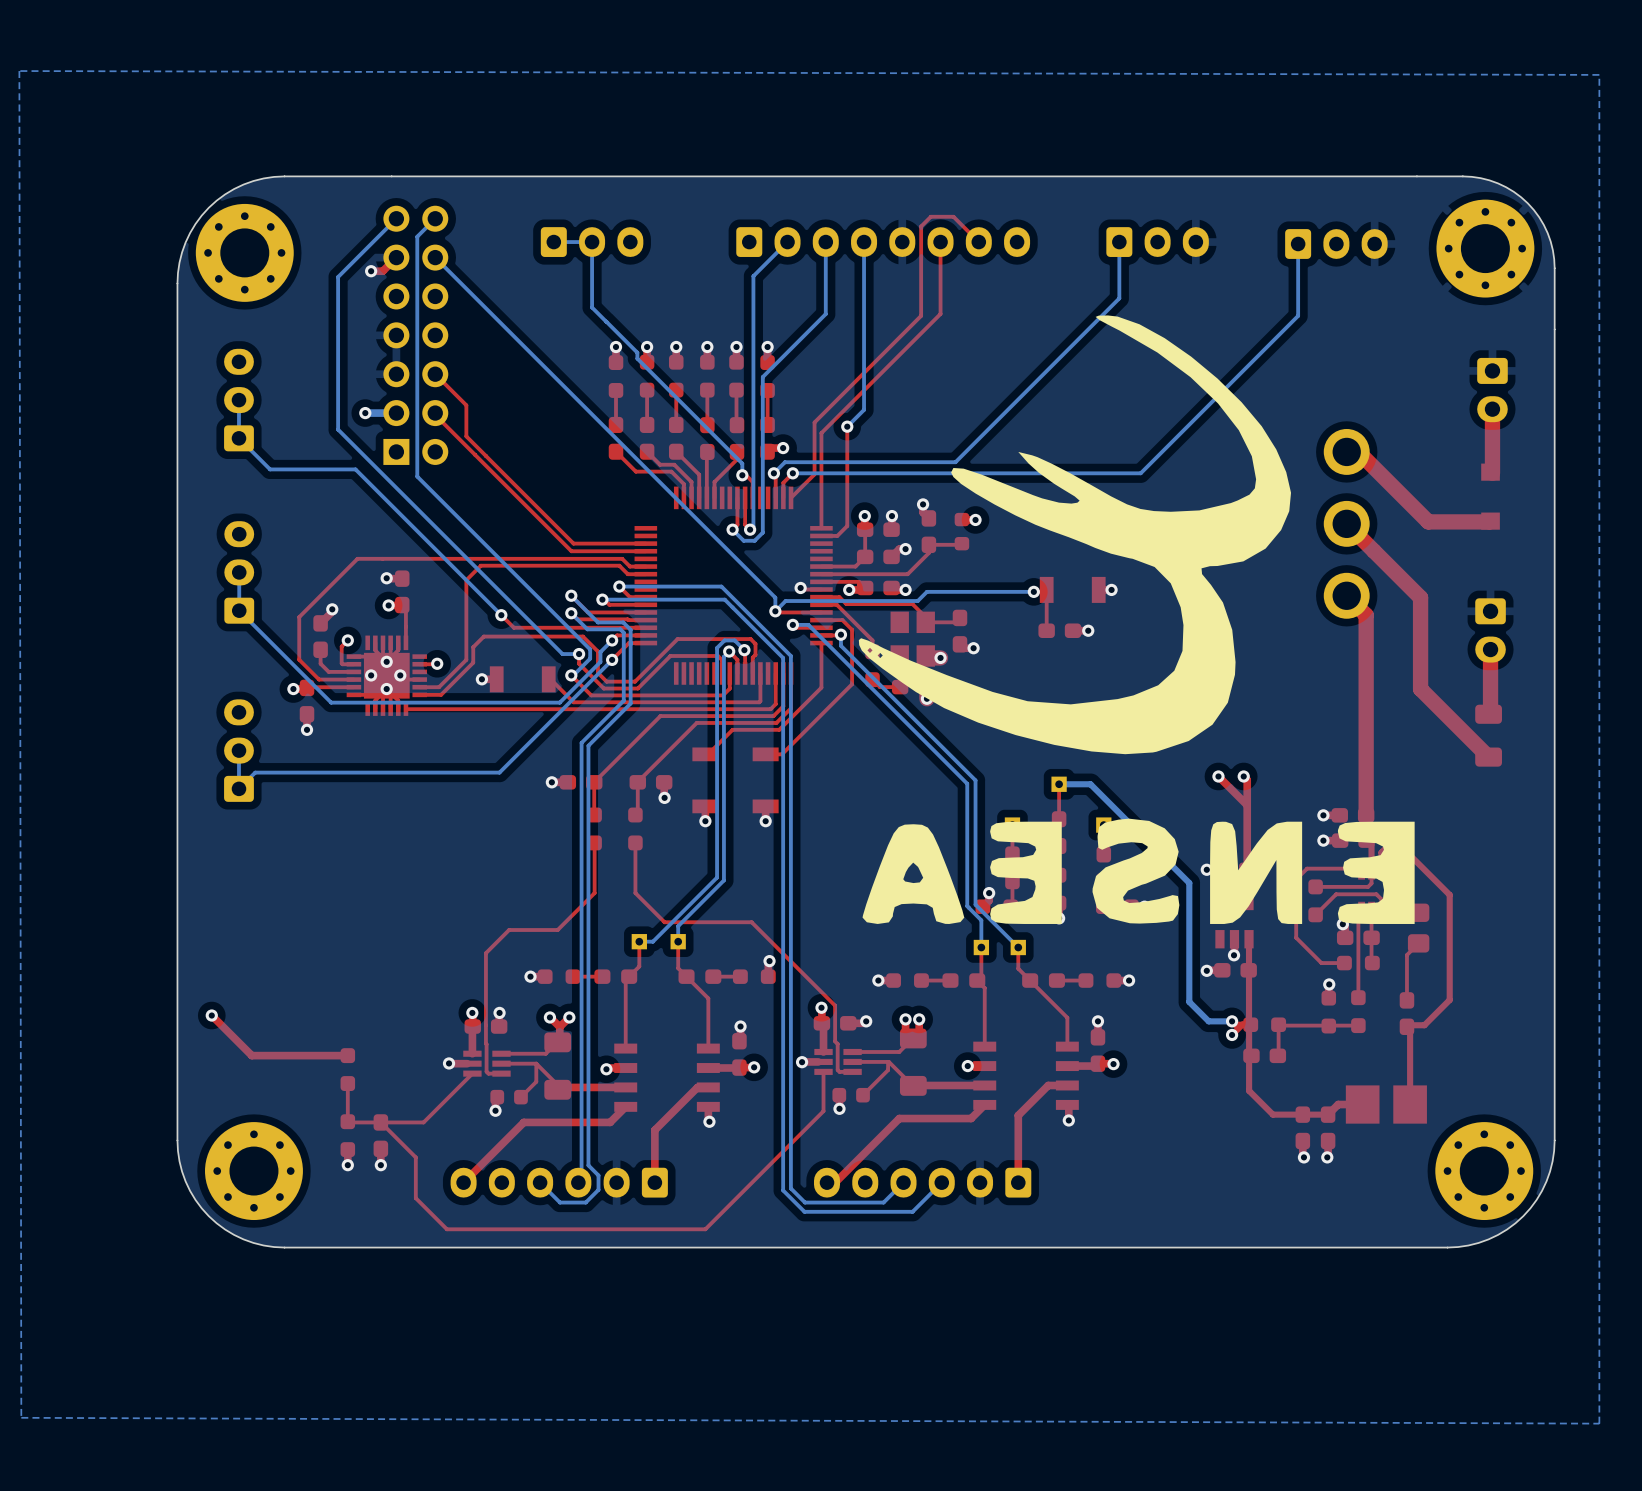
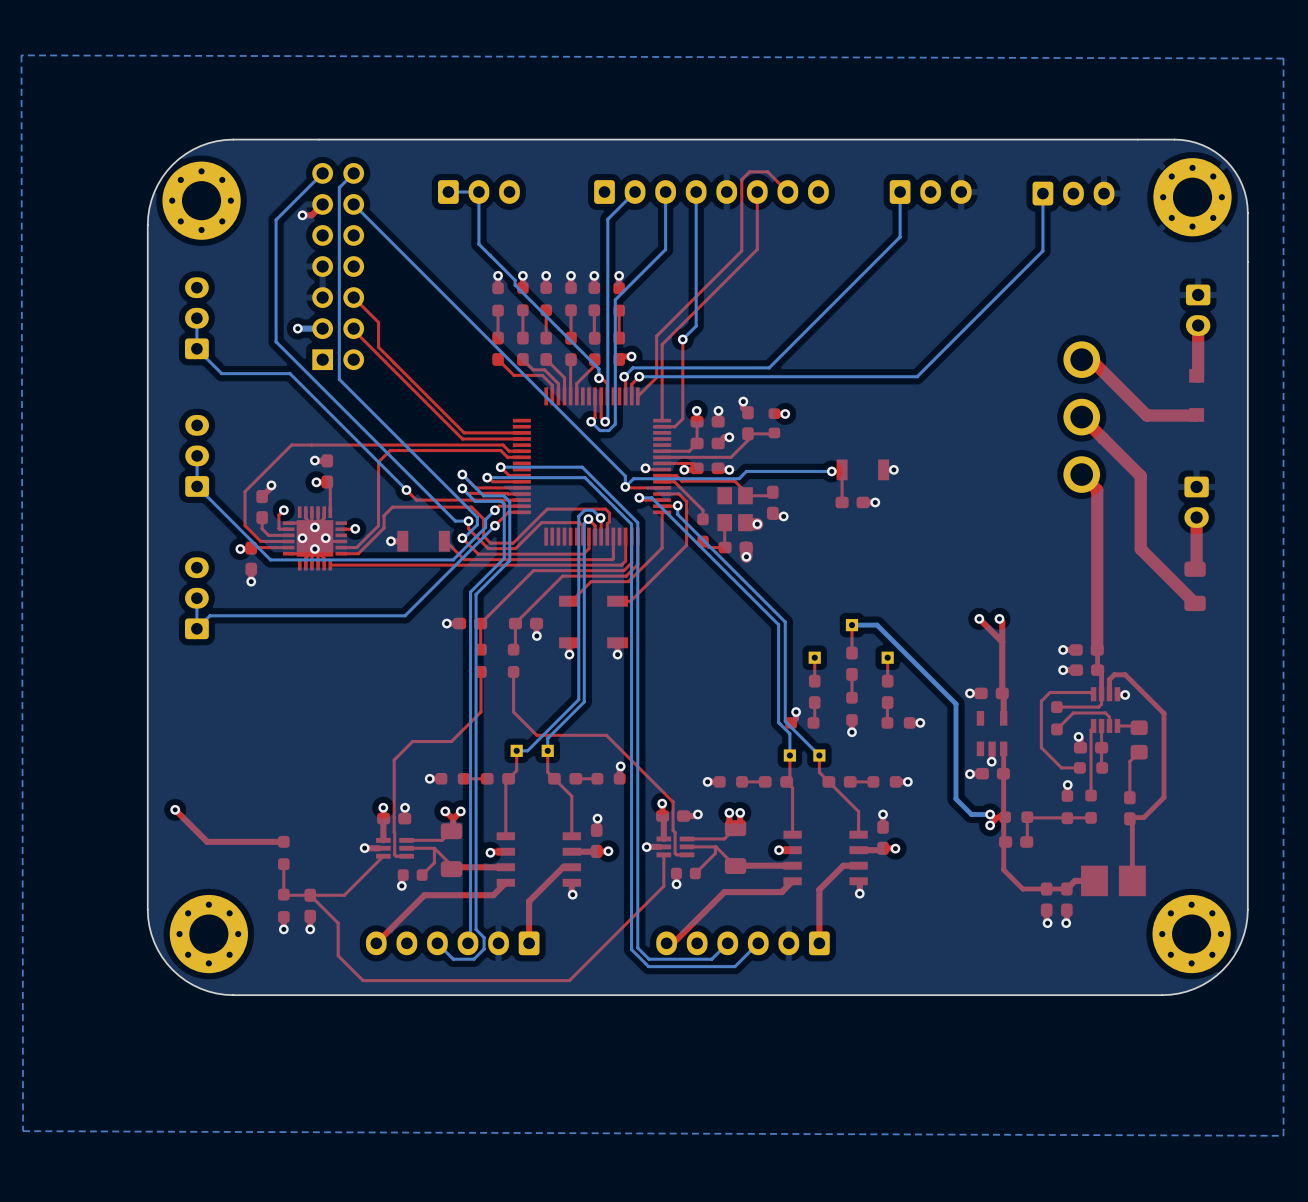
drawing: [858, 315, 1415, 924] -> none

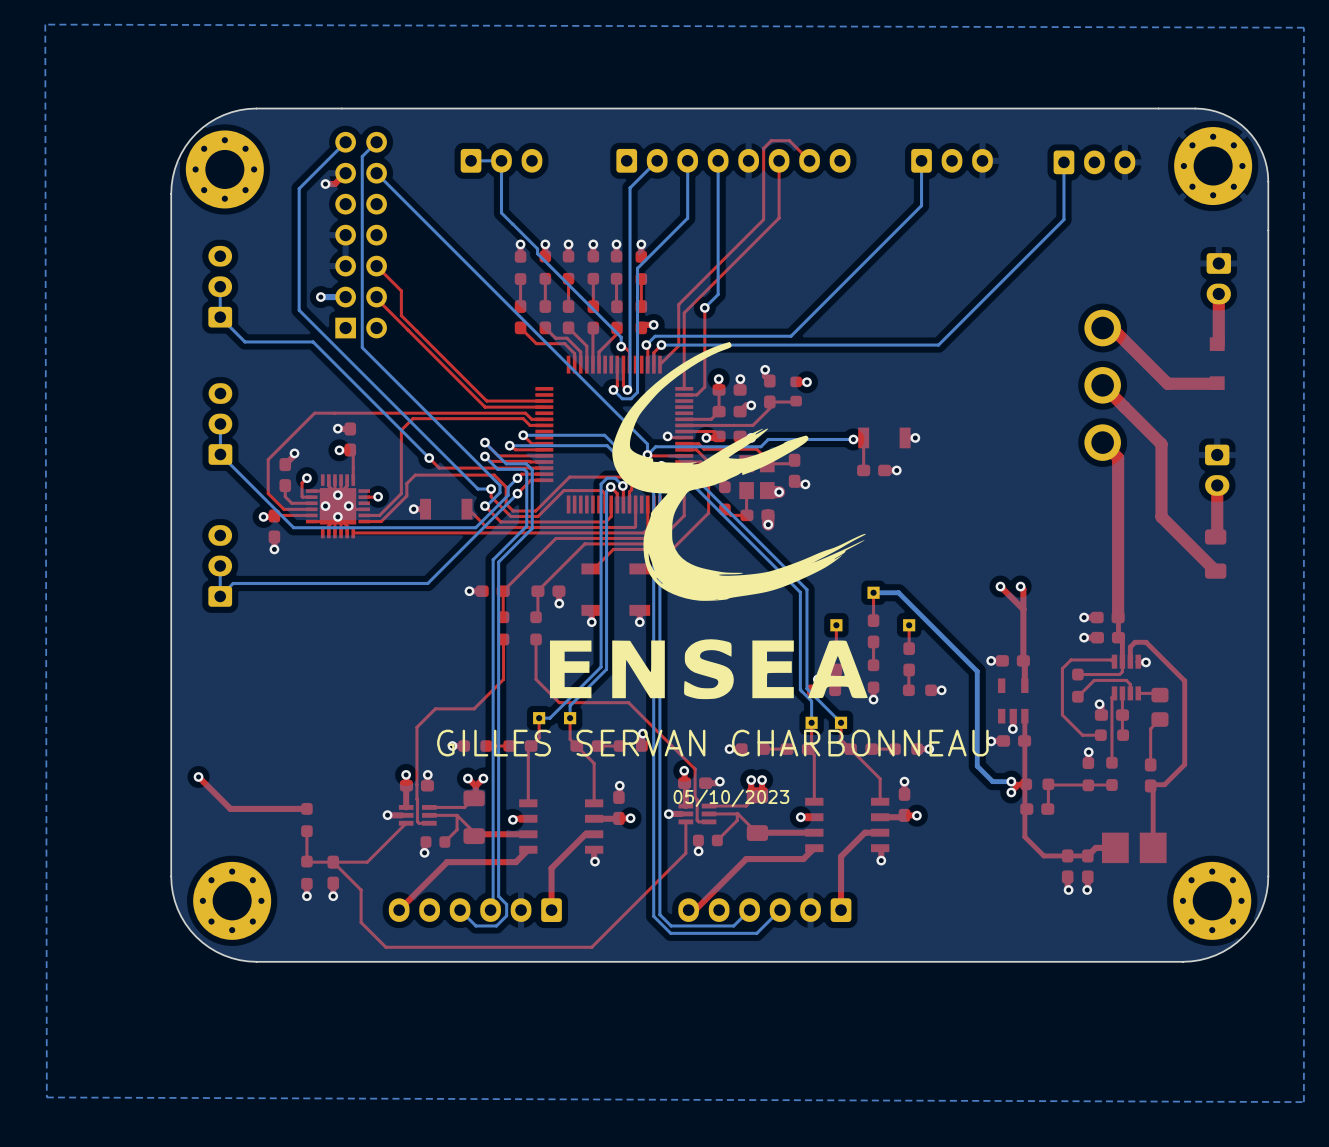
drawing: none -> [549, 341, 868, 700]
text: none -> GILLES SERVAN CHARBONNEAU (712, 743)
text: none -> 05/10/2023 (731, 798)

